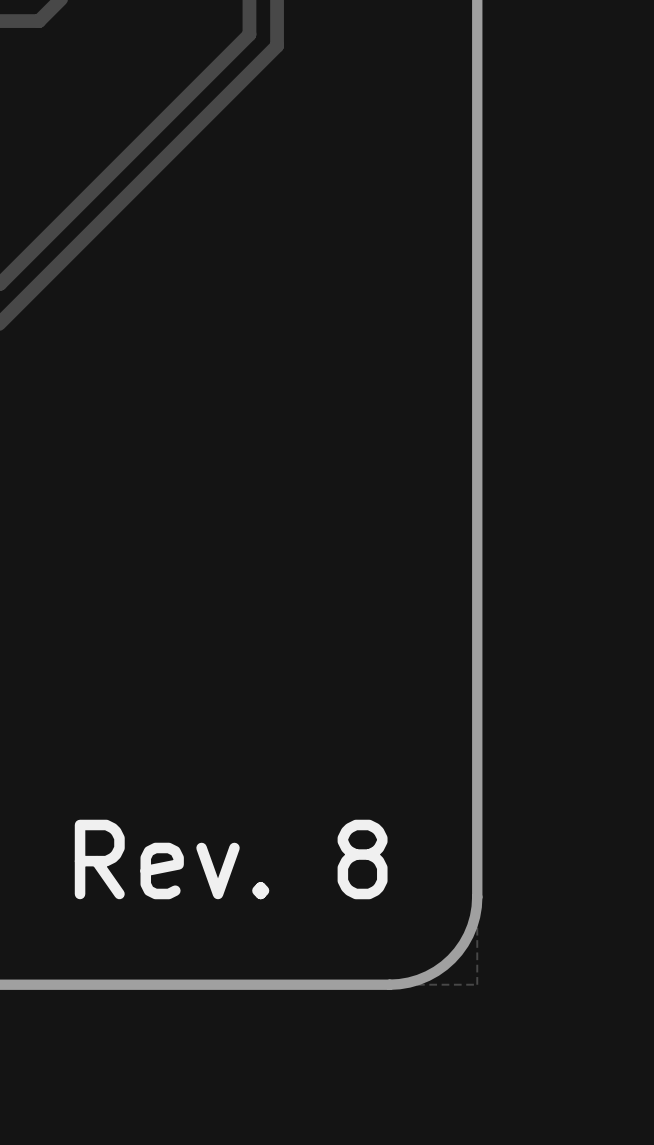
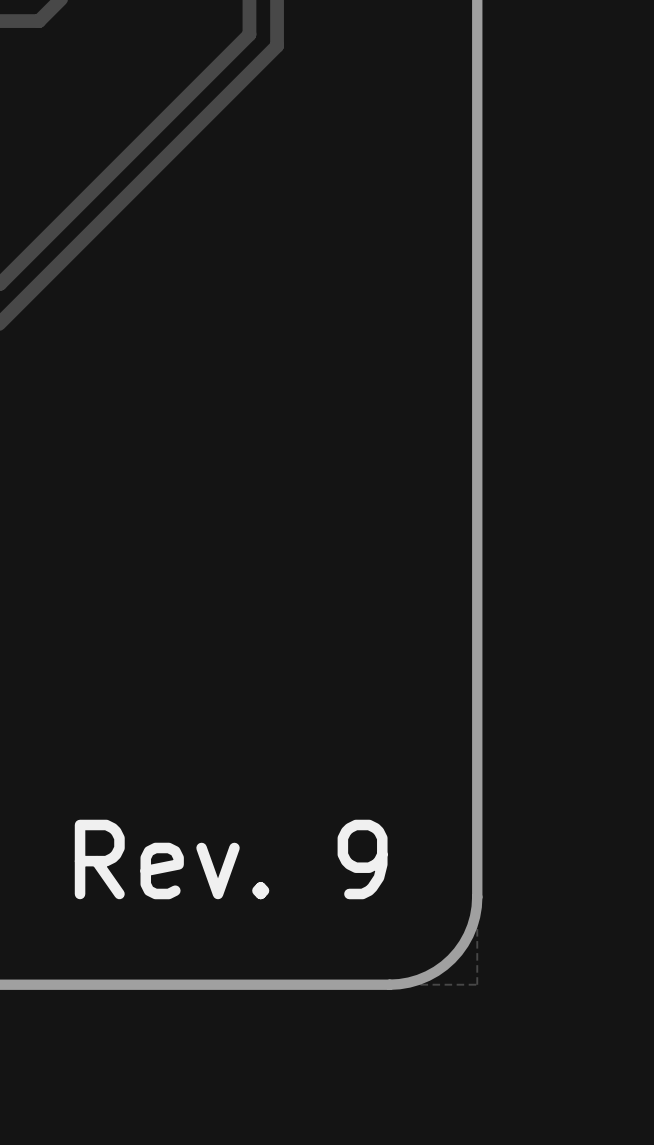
text: Rev. 8 (231, 859) -> Rev. 9 (231, 859)

